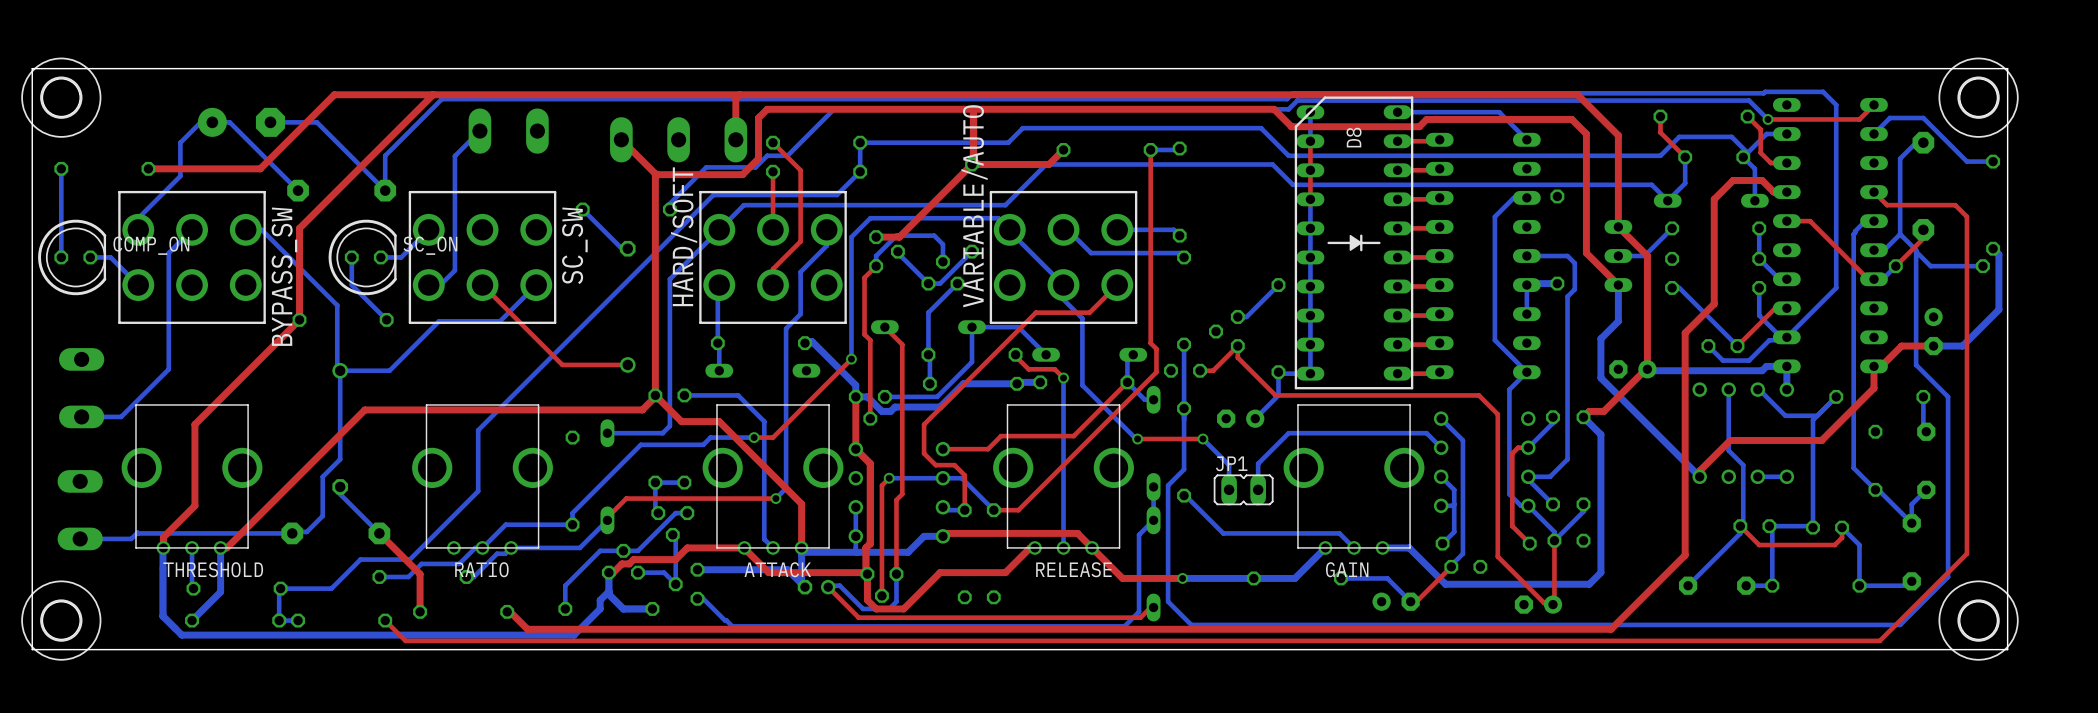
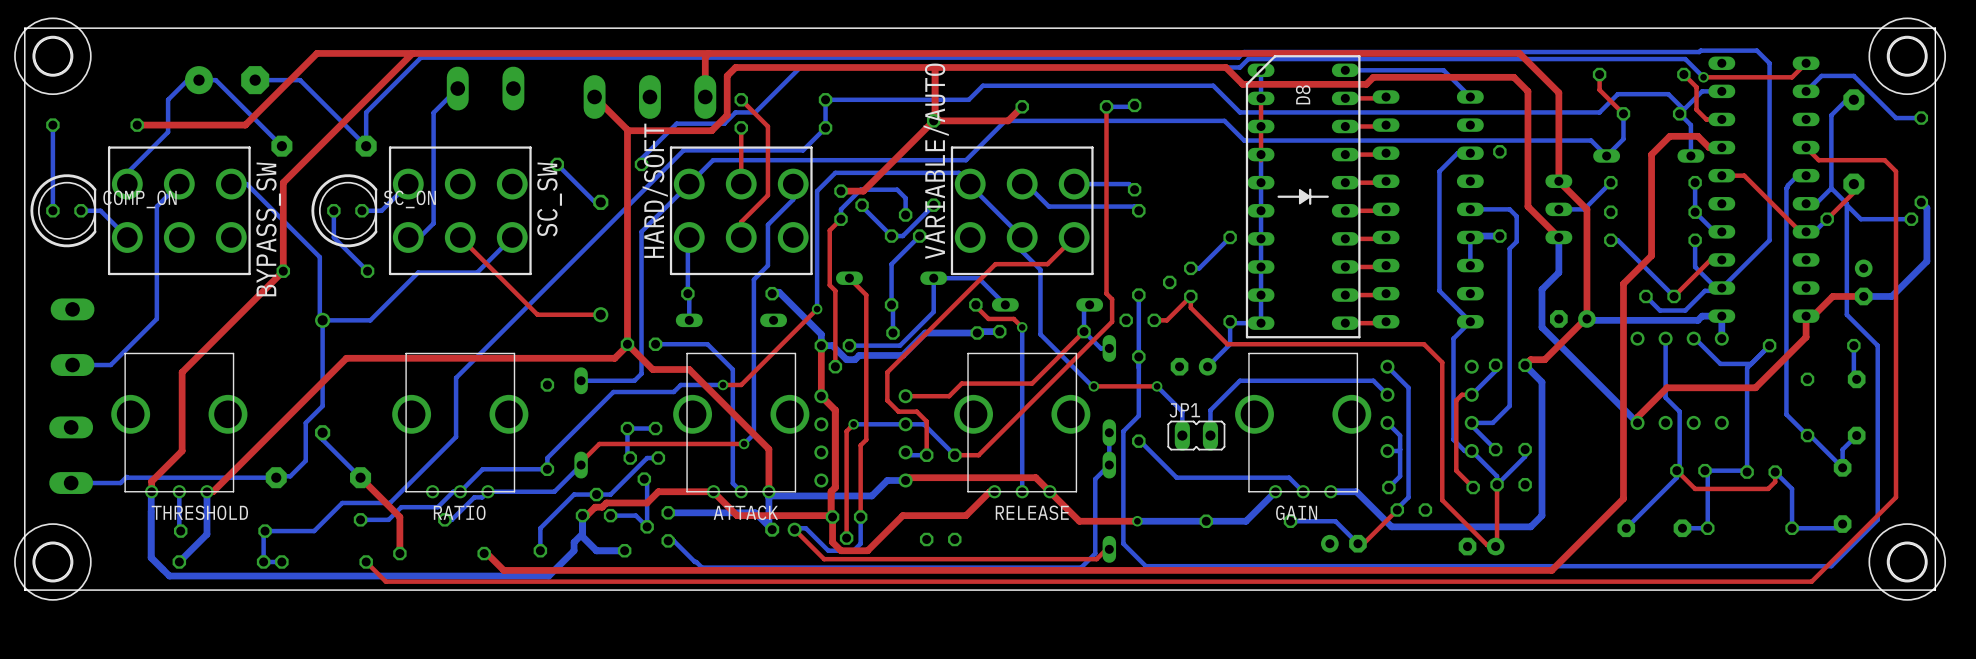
bottom track: (1757, 476) (1786, 476) -> none
bottom track: (855, 507) (857, 552) -> none

